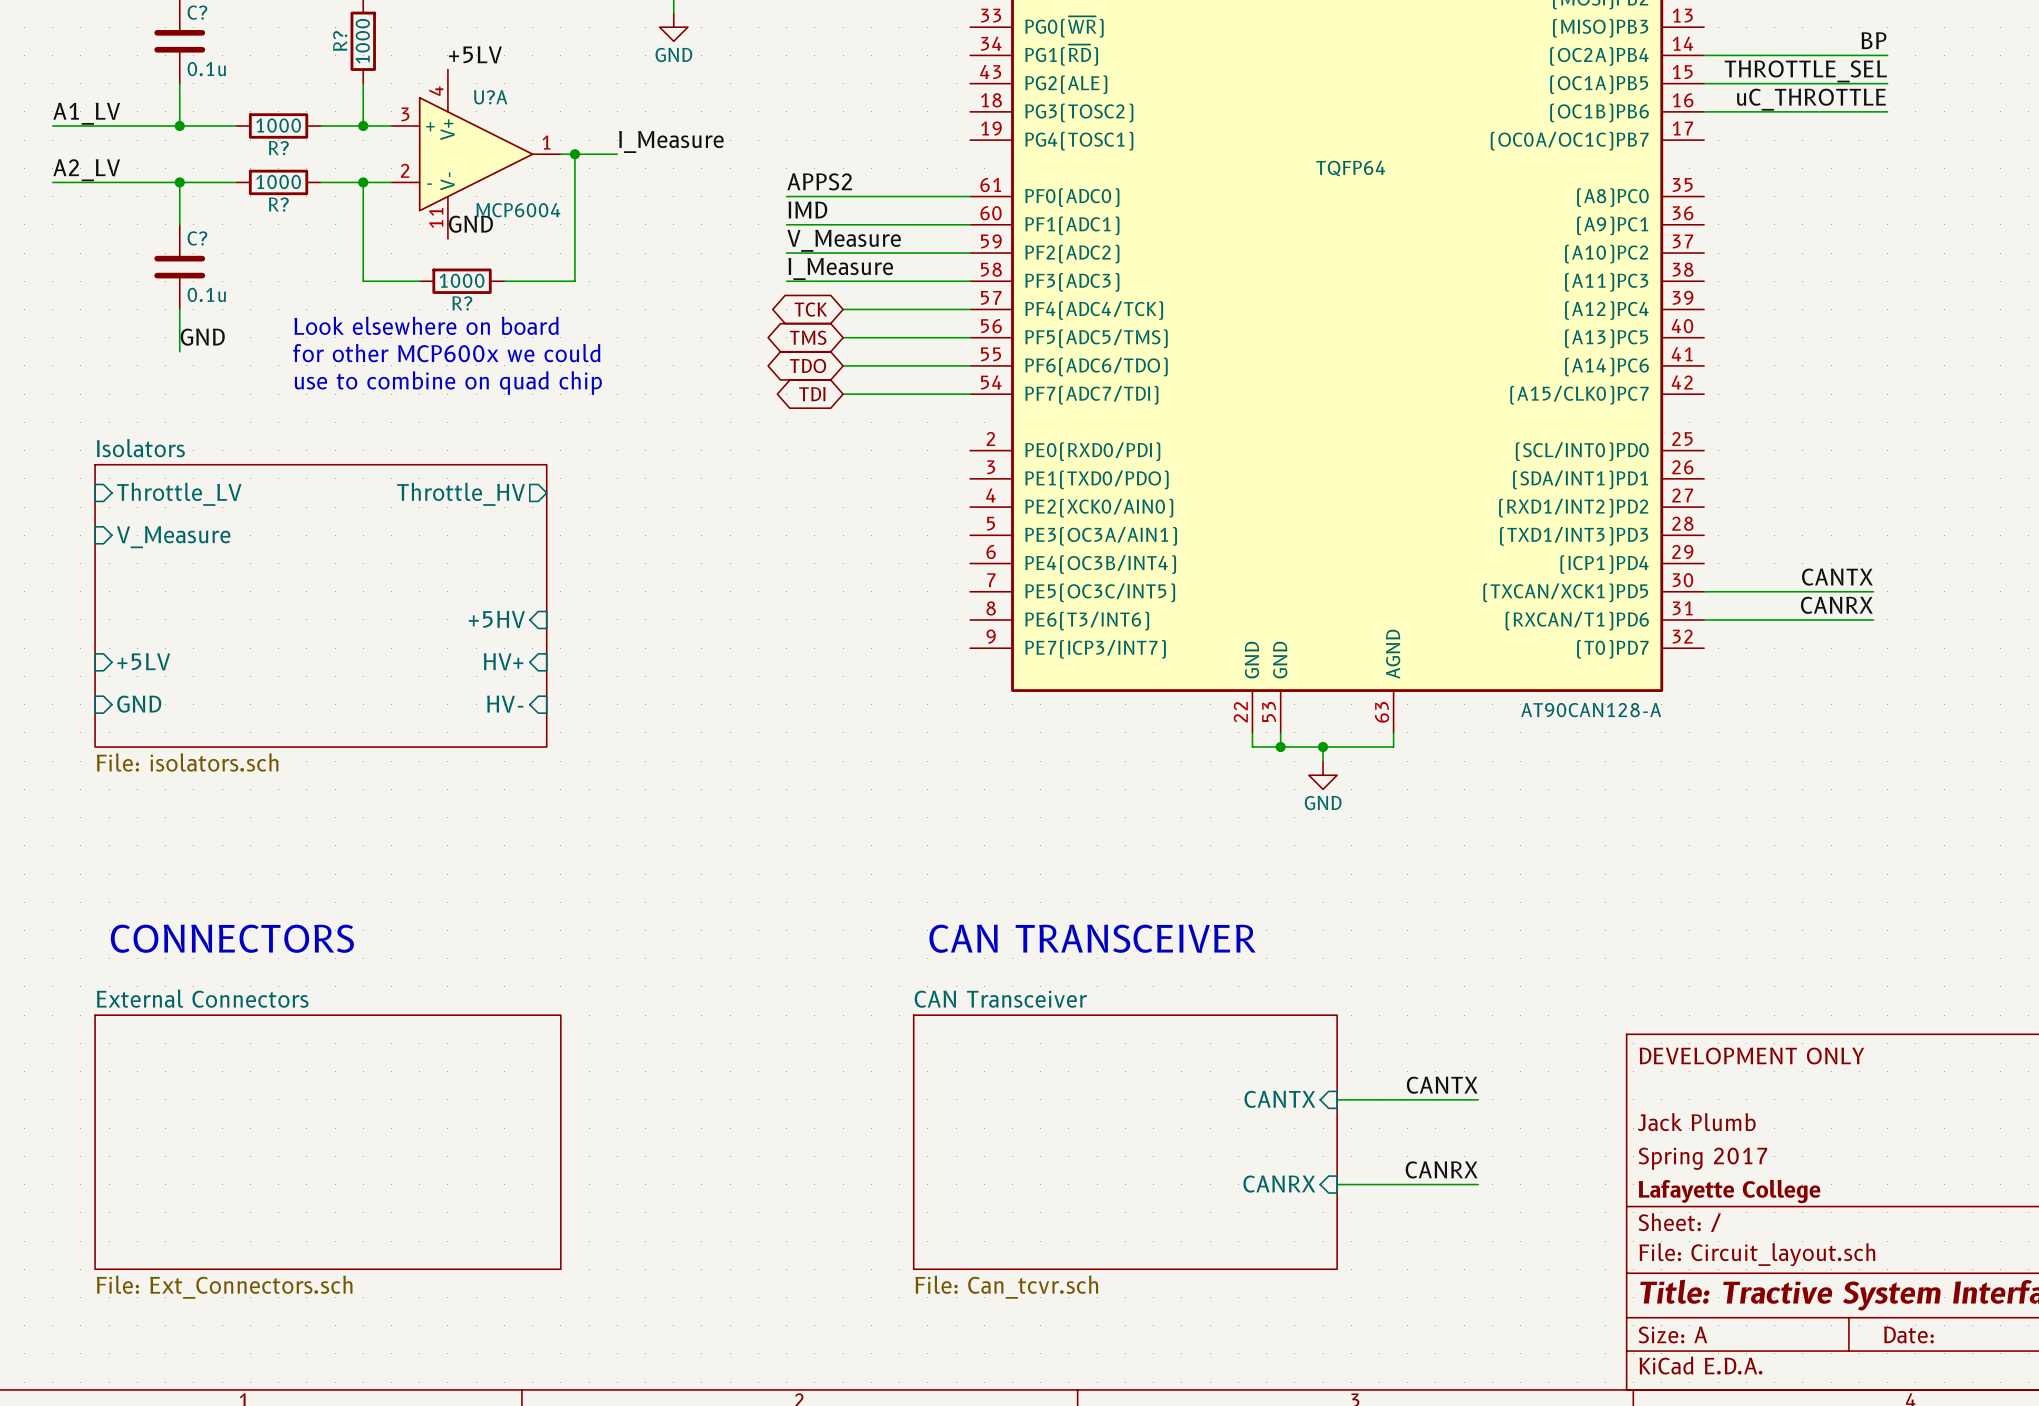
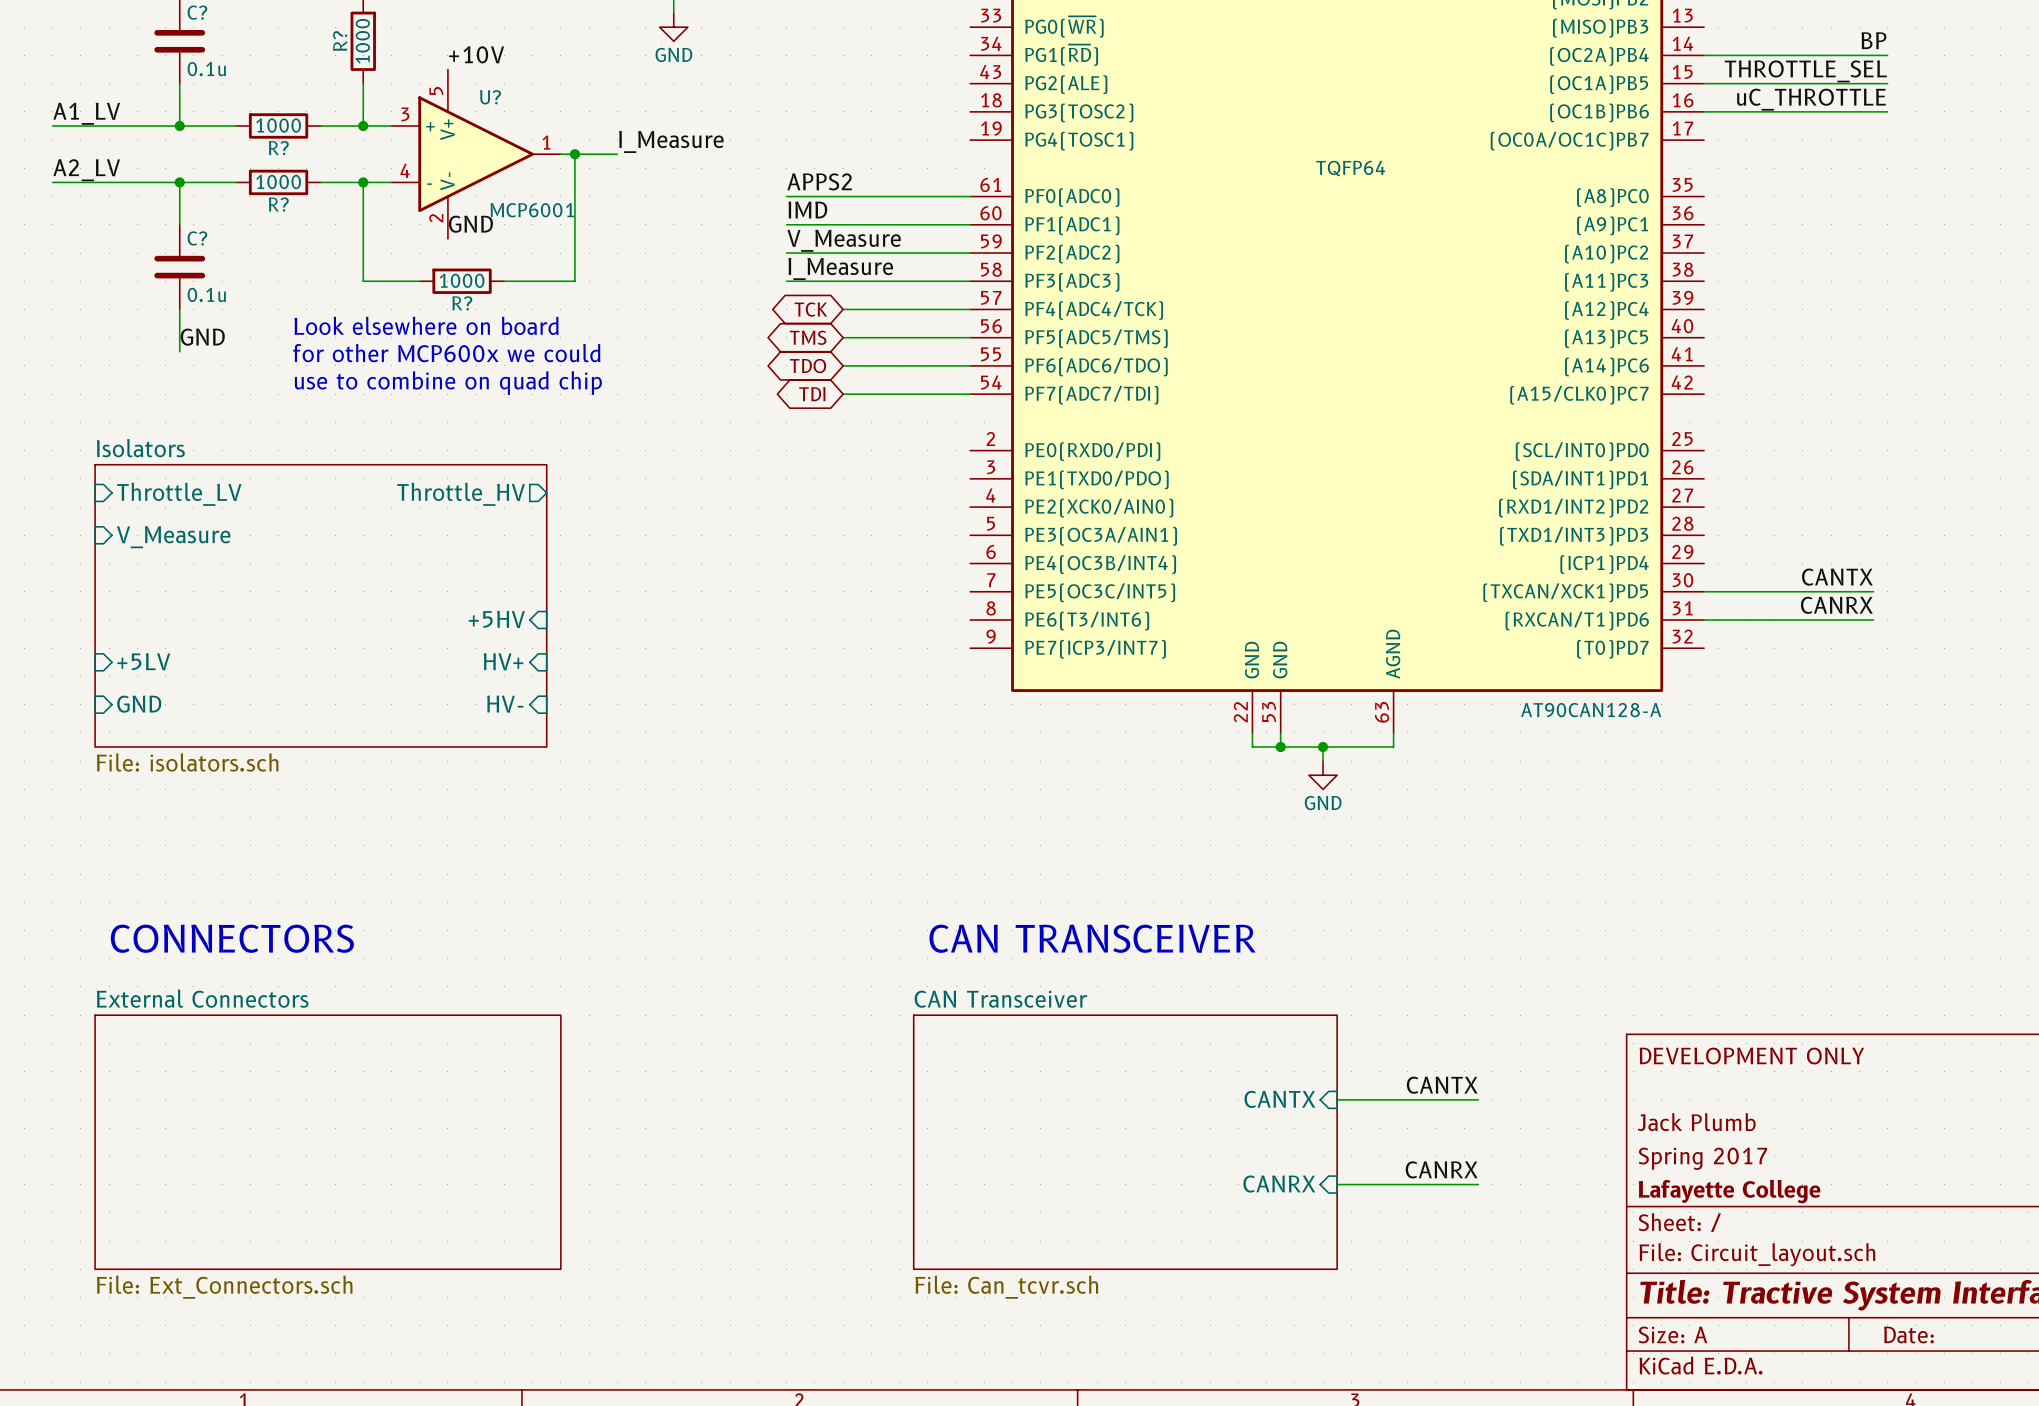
label: +5LV (475, 54) -> +10V (476, 54)
U?A: MCP6004 (476, 154) -> none
U?: none -> MCP6001 (476, 154)

